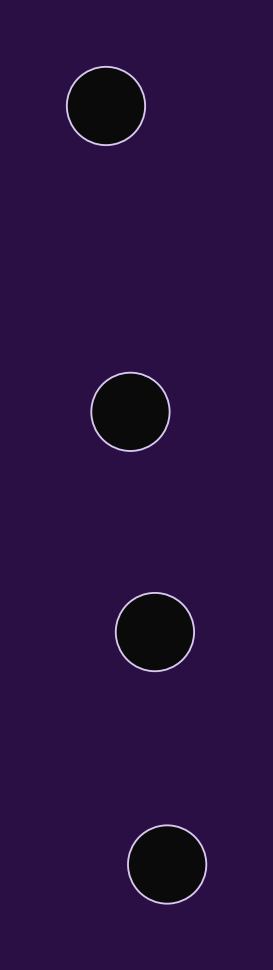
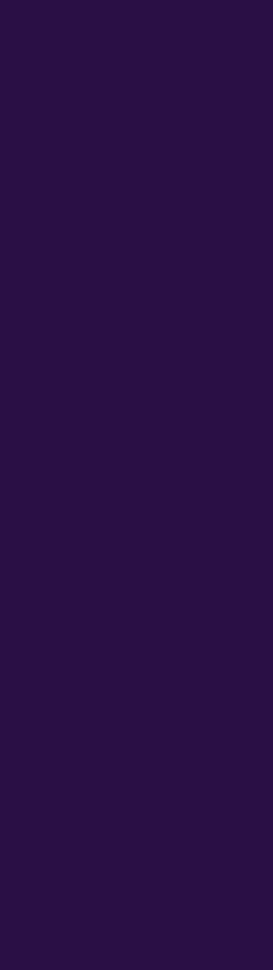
part: (105, 105) -> none
part: (130, 411) -> none
part: (154, 632) -> none
part: (167, 864) -> none

